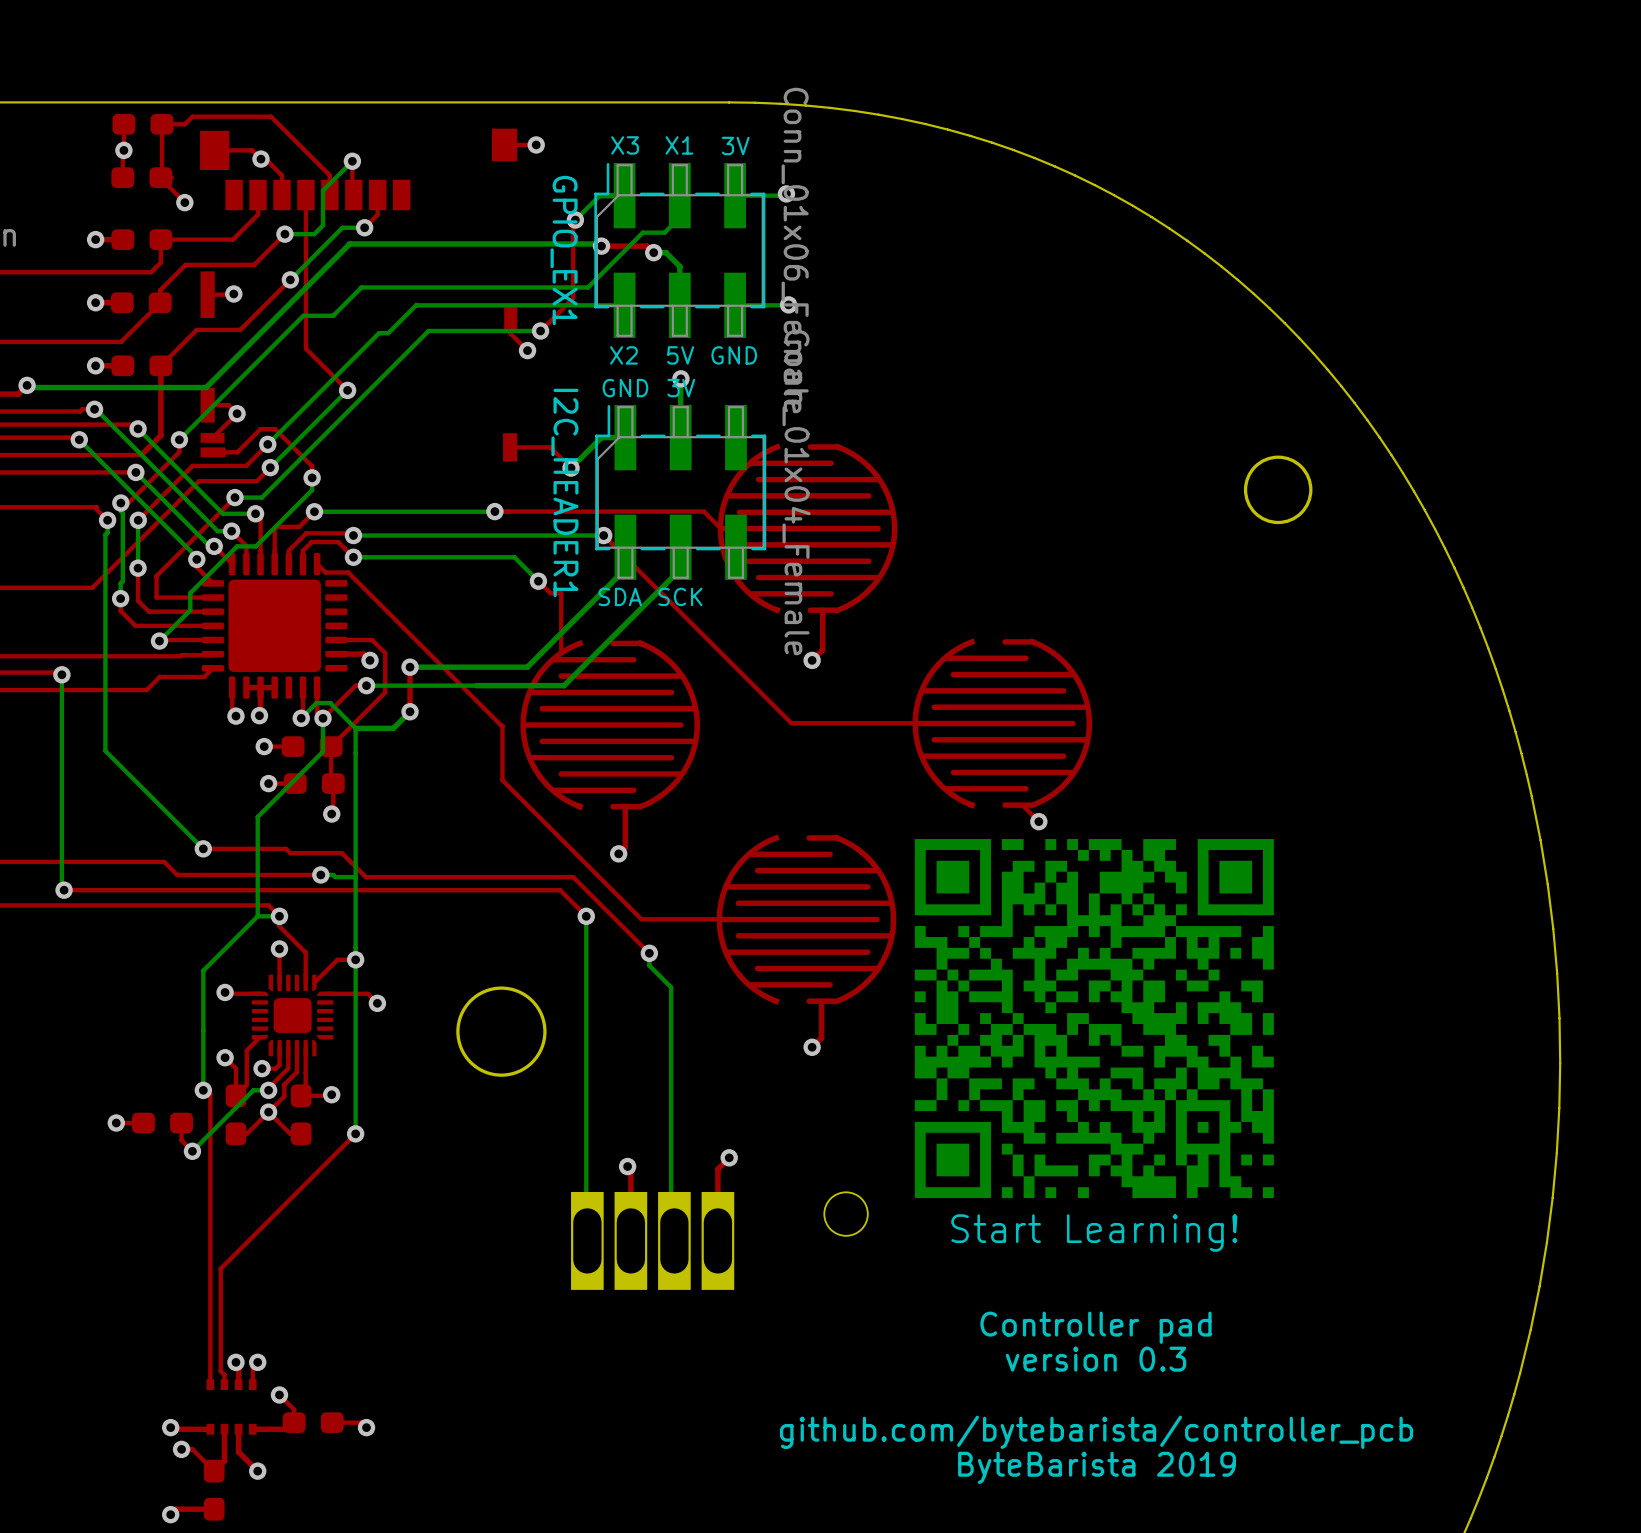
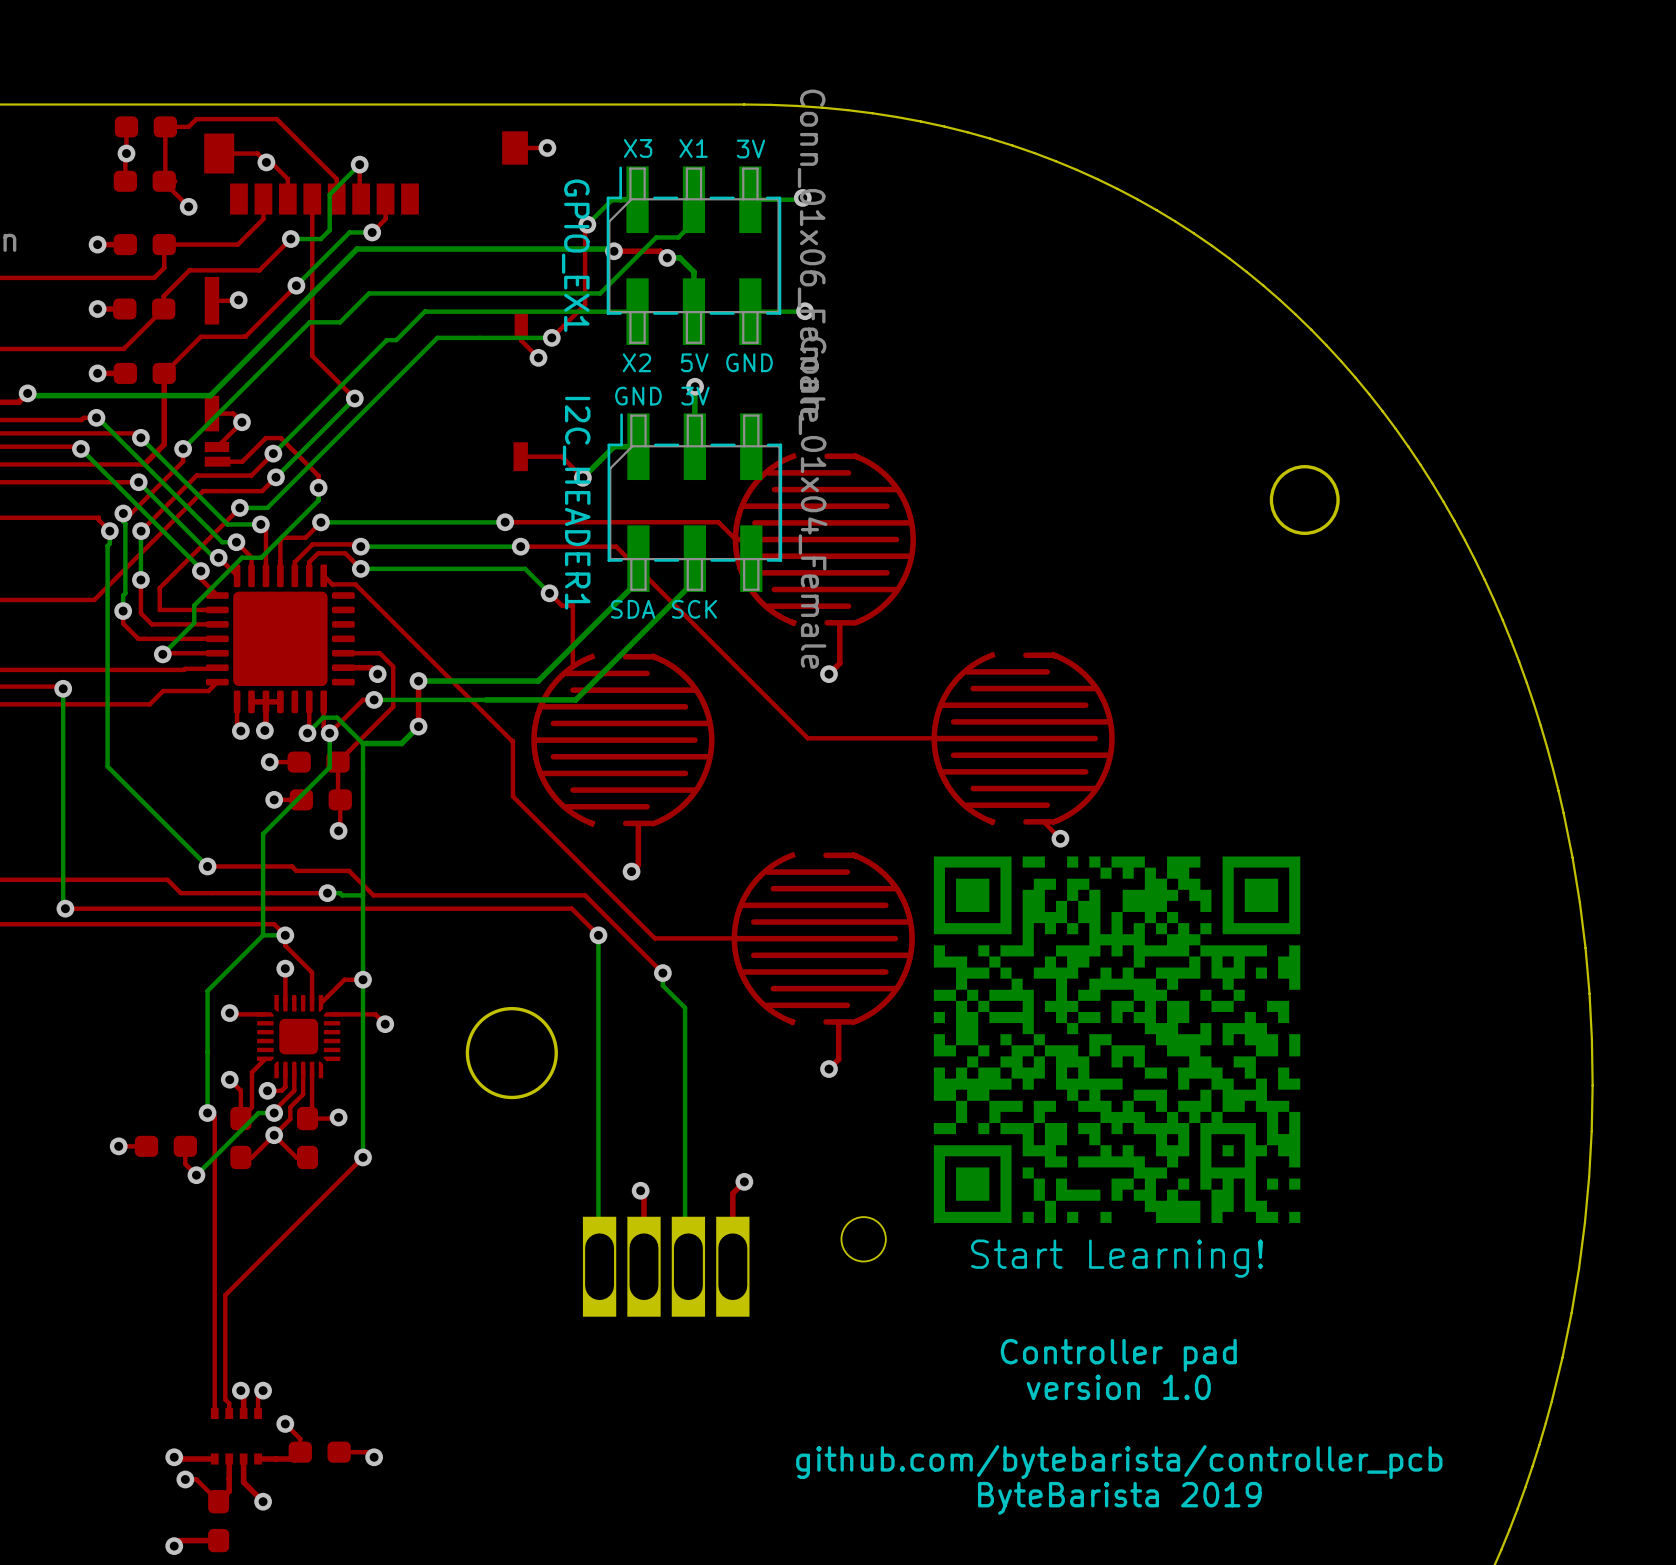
bottom track: (603, 535) (510, 535) -> none
top track: none -> (616, 546) (520, 546)
via position: (603, 535) -> (520, 546)
text: version 0.3 (1095, 1359) -> version 1.0 (1118, 1387)

